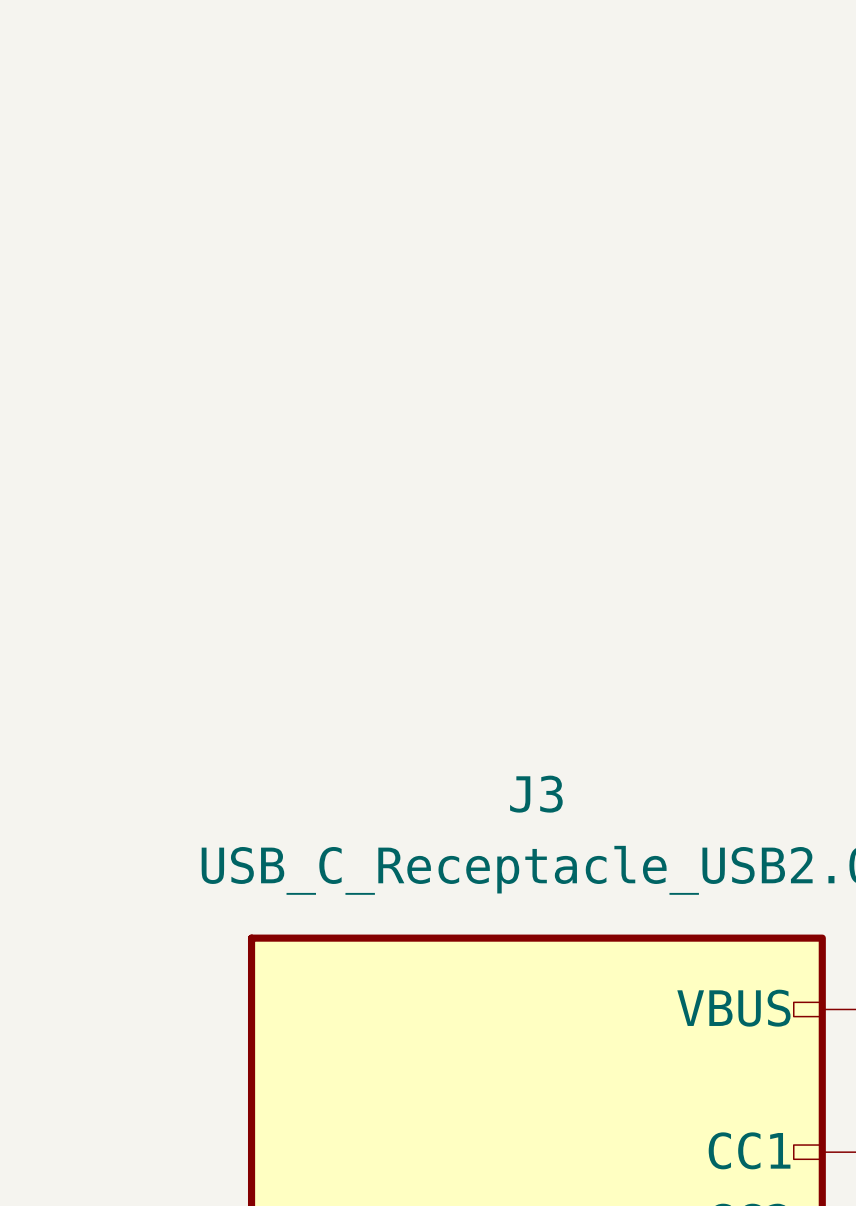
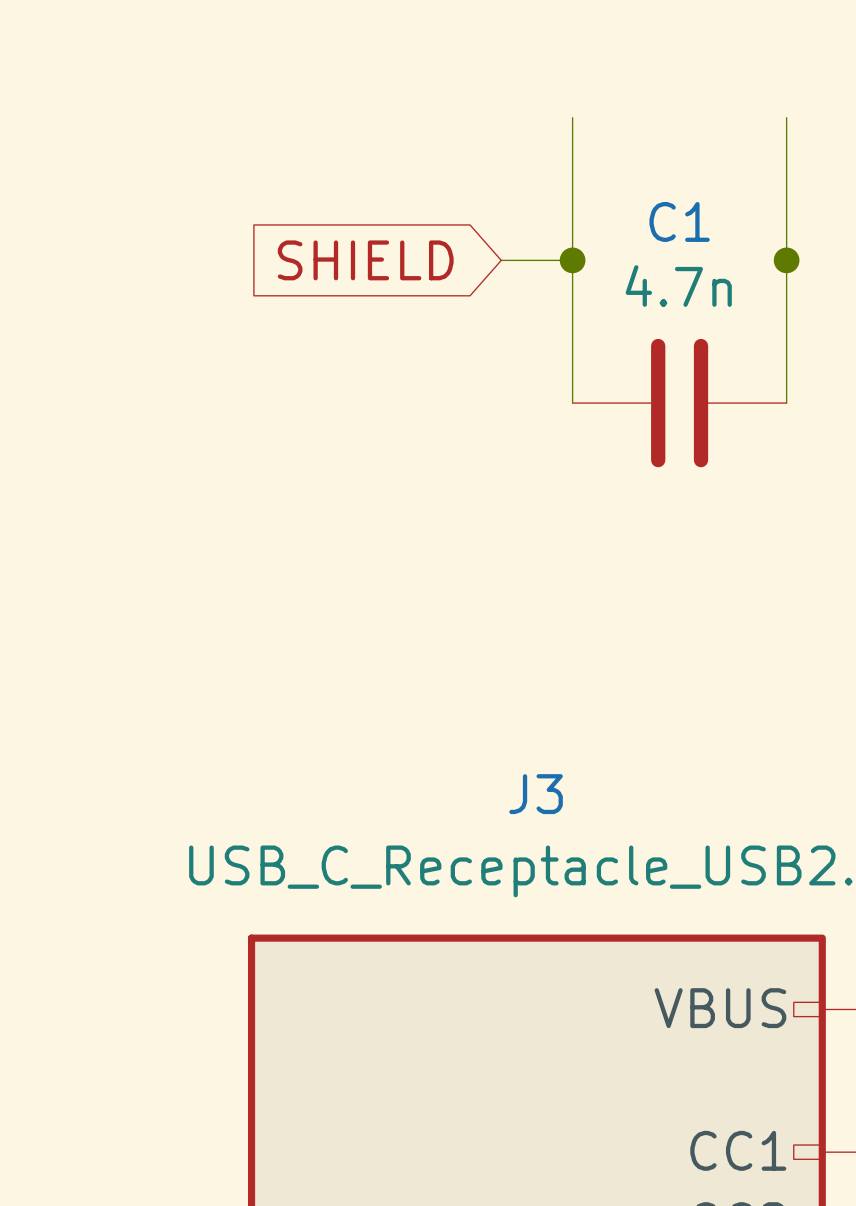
wire: none -> (572, 117) (572, 403)
wire: none -> (786, 117) (786, 403)
global label: none -> SHIELD (365, 260)
wire: none -> (501, 260) (572, 260)
junction: none -> (572, 260)
junction: none -> (786, 260)
C1: none -> 4.7n (679, 403)

